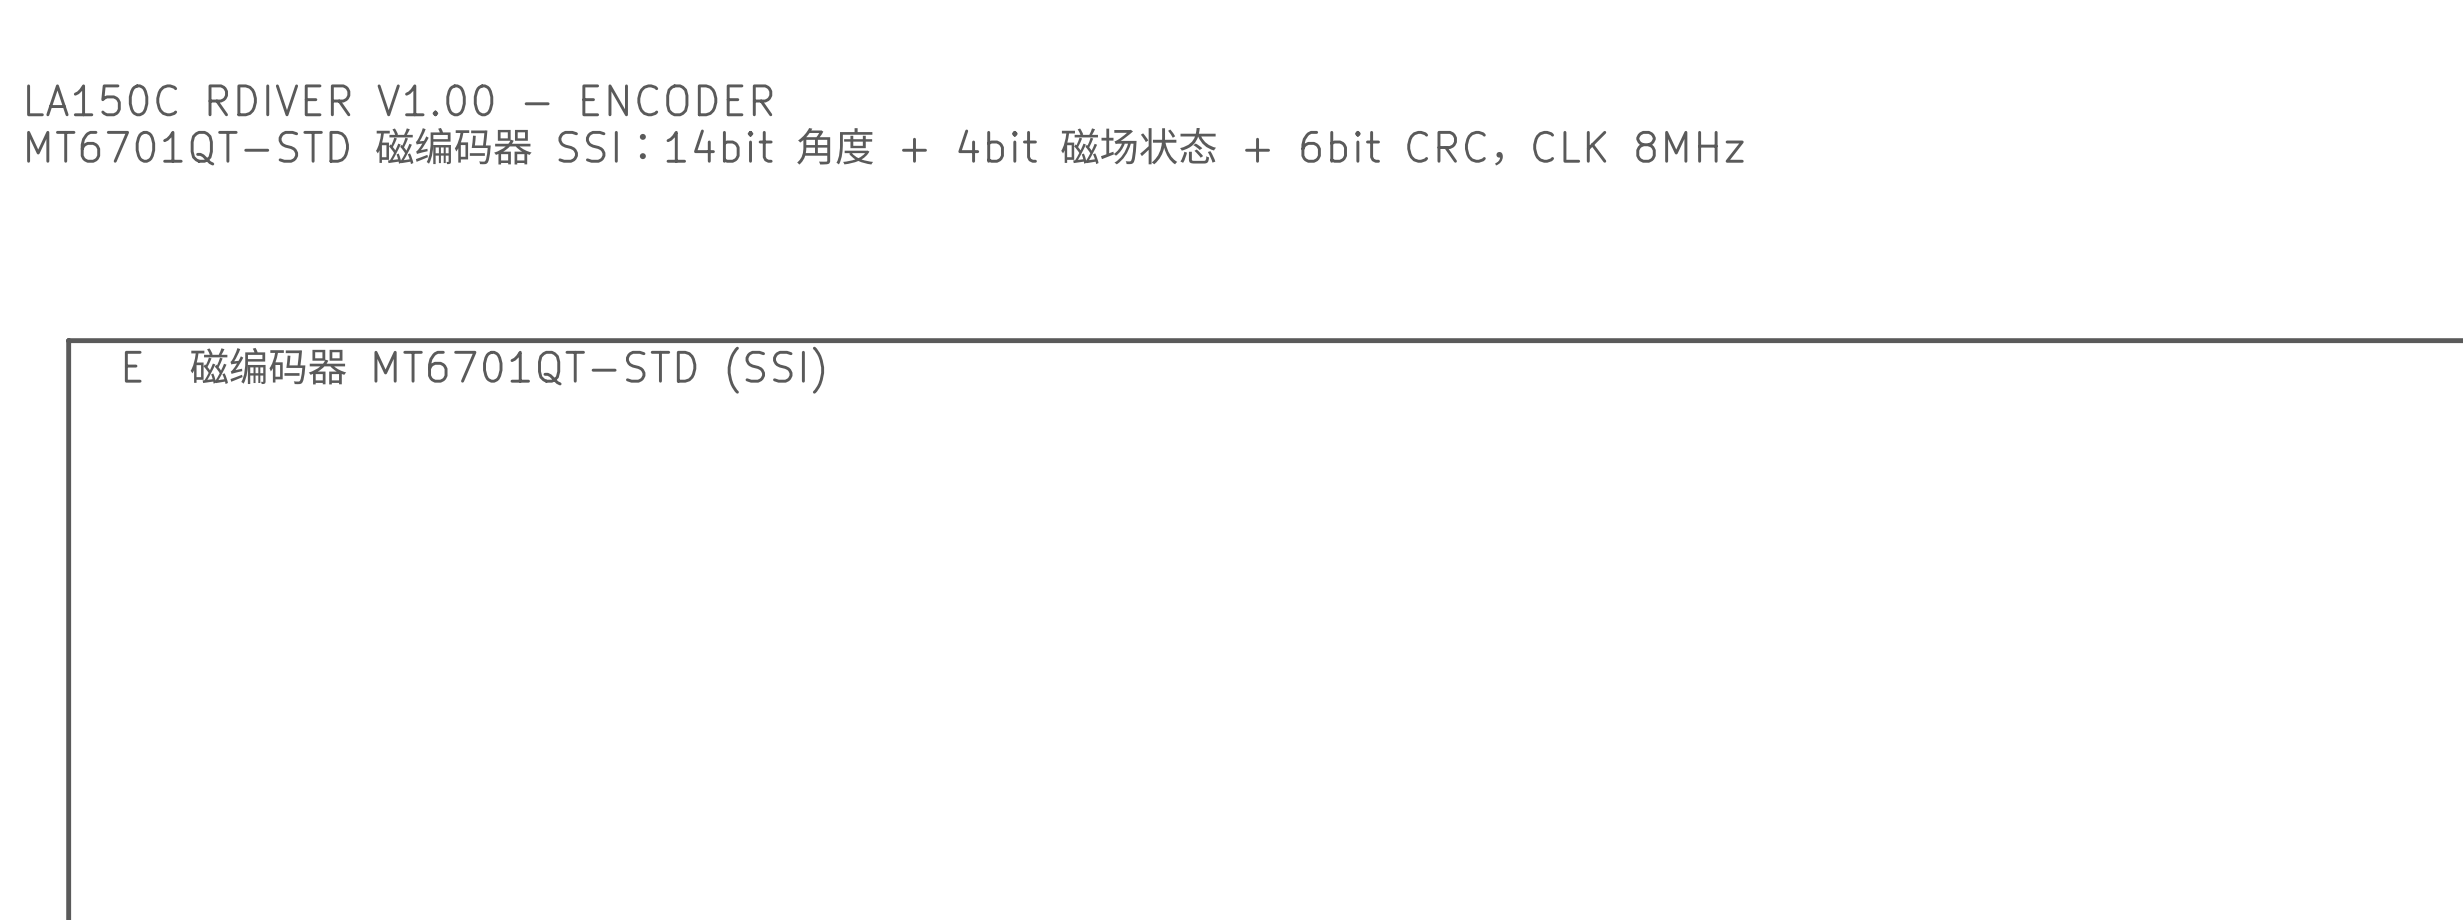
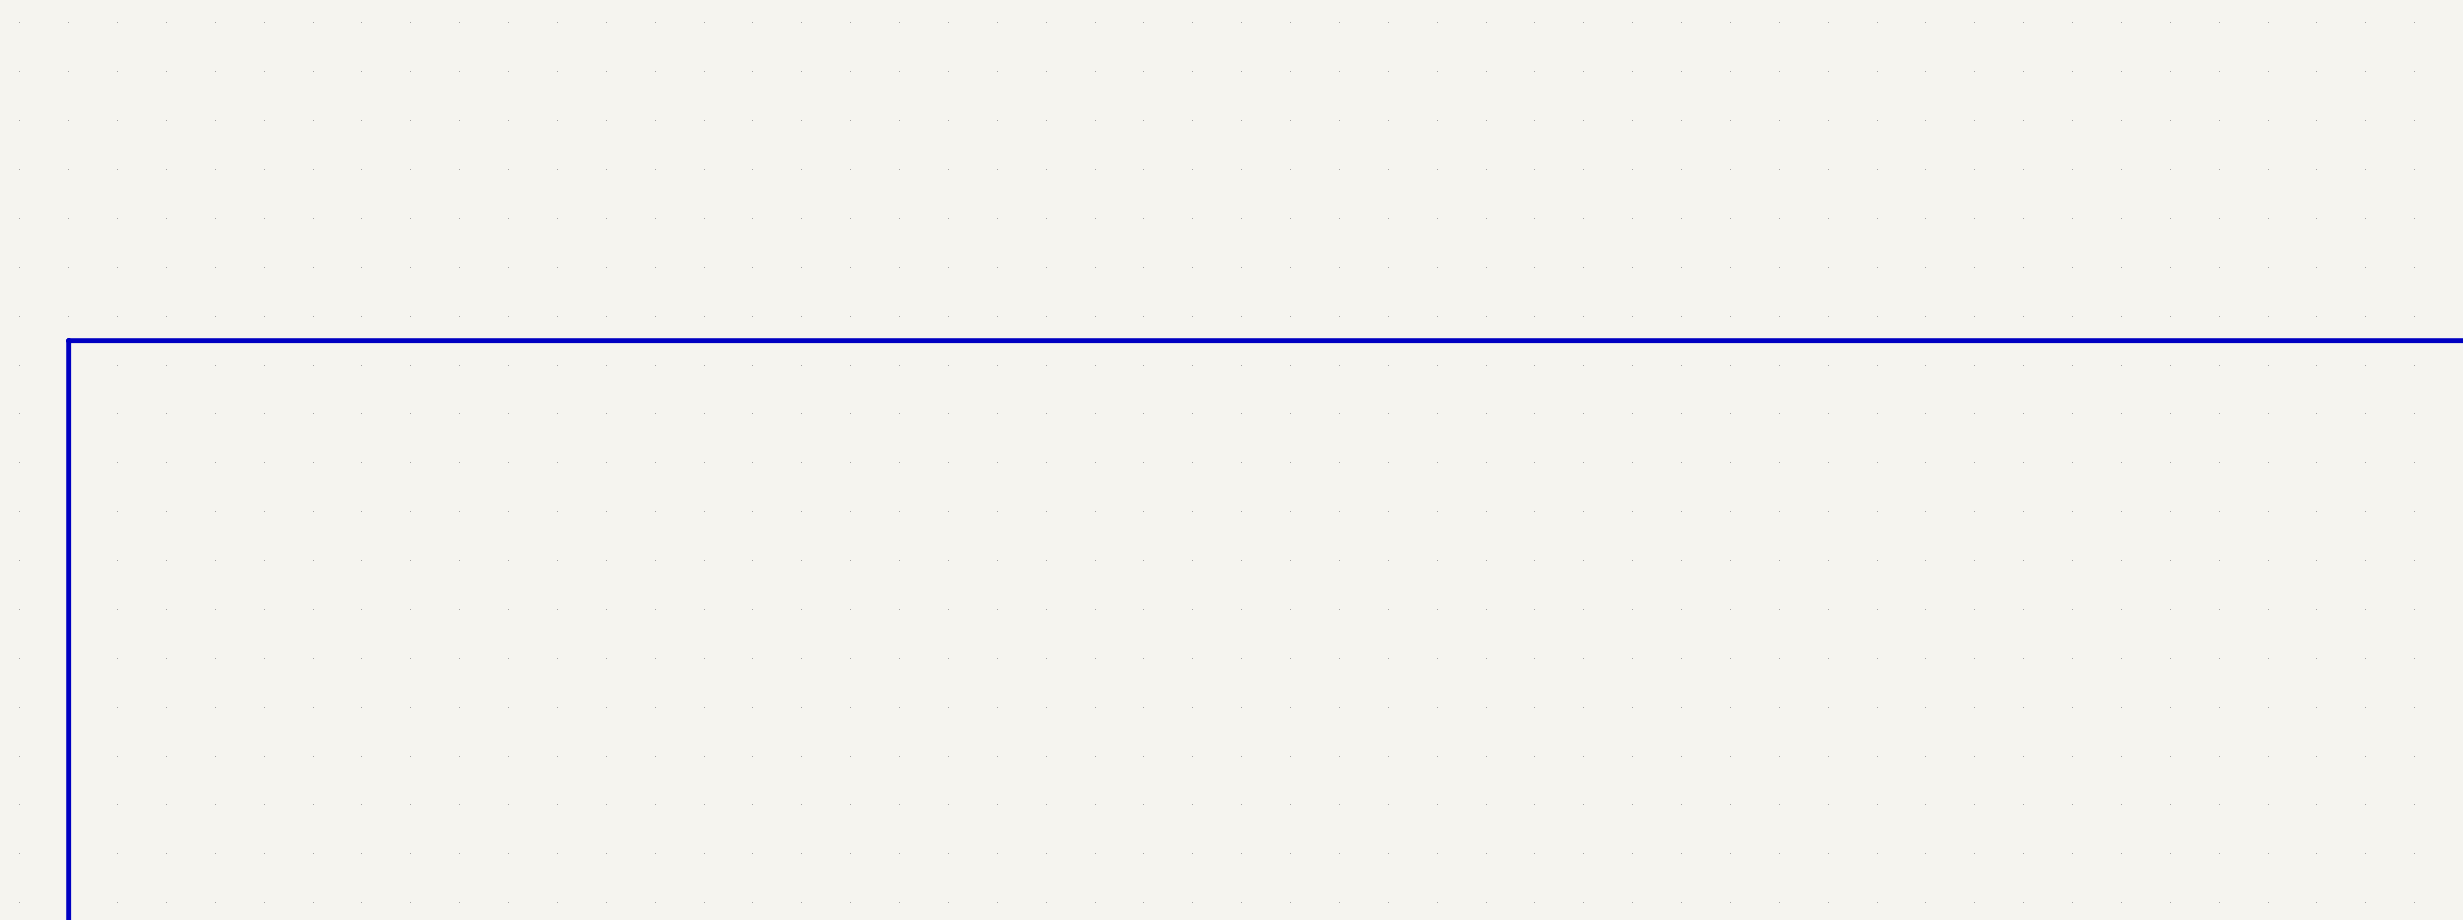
text: LA150C RDIVER V1.00 - ENCODER (399, 100) -> none
text: MT6701QT-STD 磁编码器 SSI：14bit 角度 + 4bit 磁场状态 + 6bit CRC，CLK 8MHz (885, 146) -> none
text: E 磁编码器 MT6701QT-STD (SSI) (474, 370) -> none

